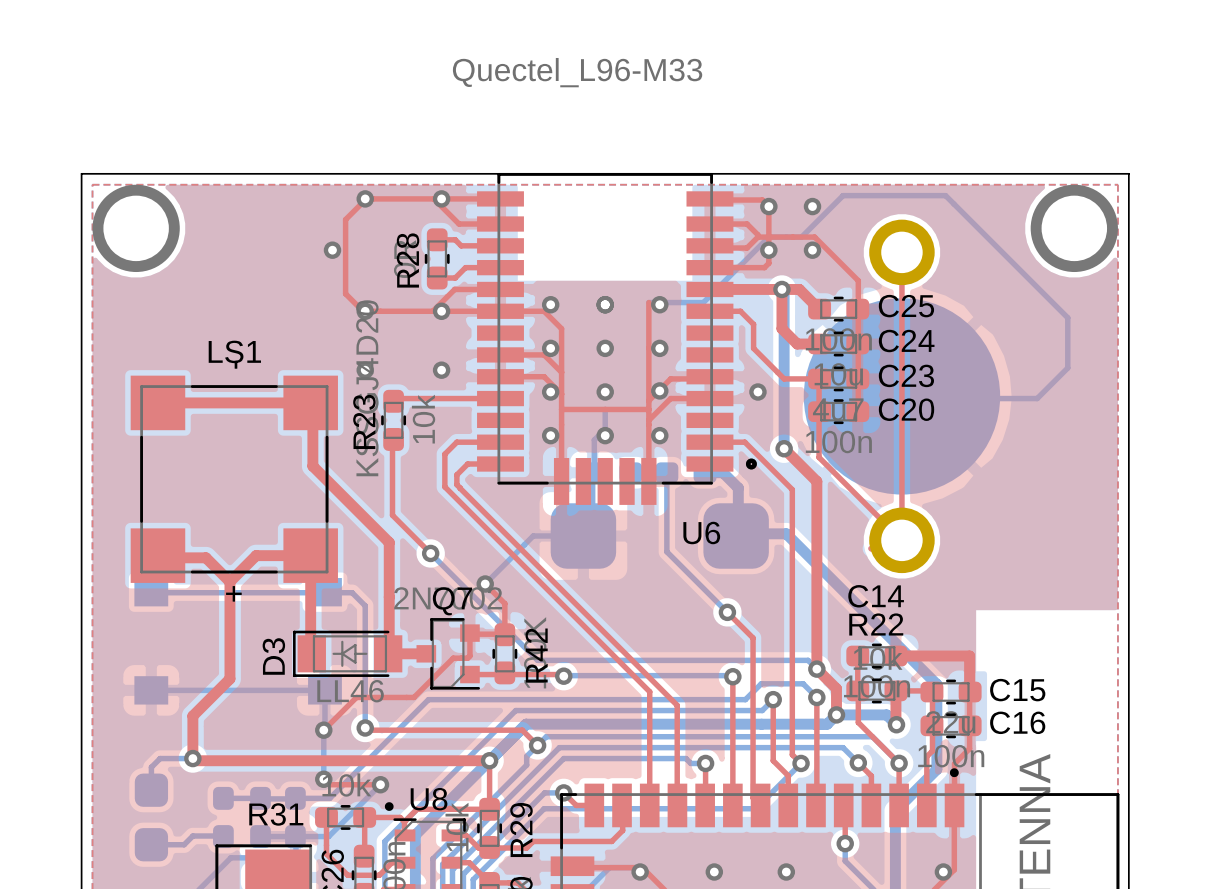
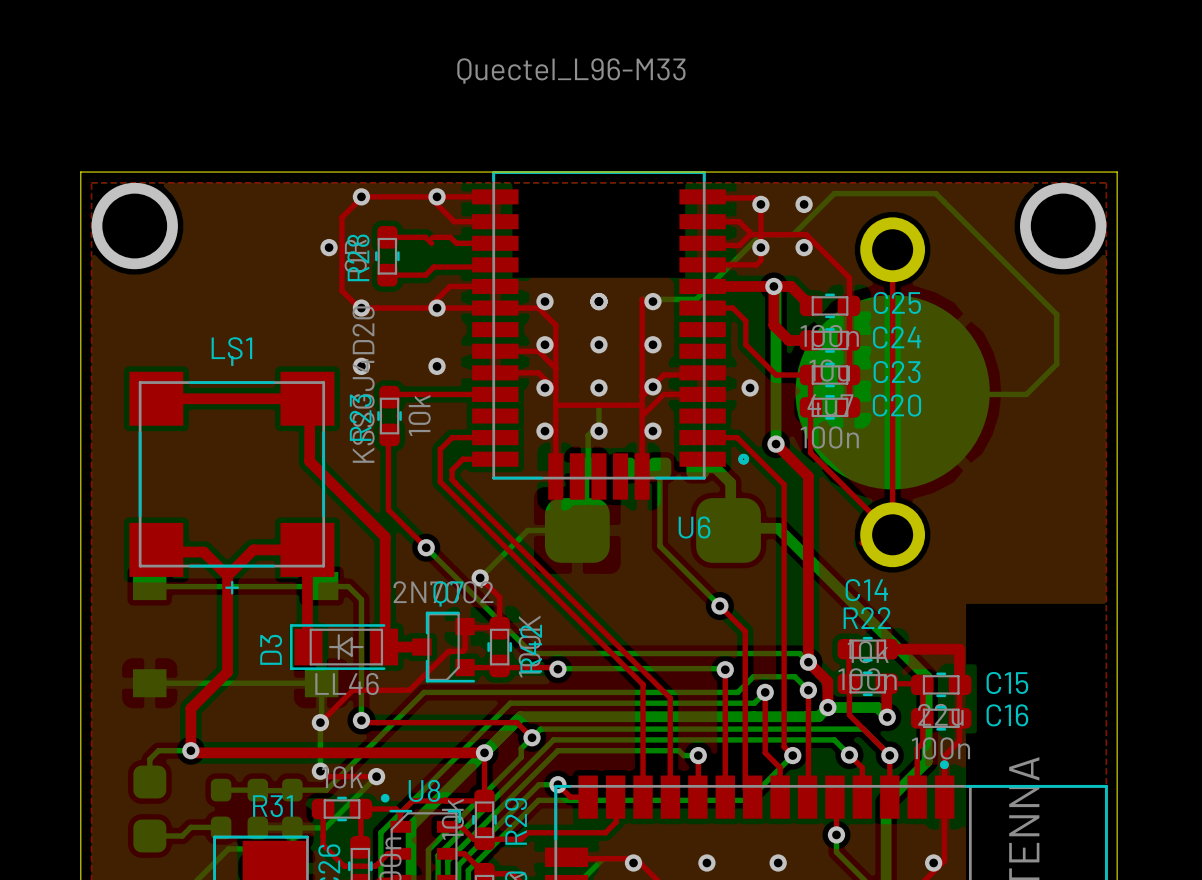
top track: none -> (387, 237) (425, 237)
R28 position: (437, 258) -> (387, 256)
top track: (501, 267) (465, 267) (455, 278) (437, 278) -> none
top track: none -> (433, 267) (495, 267)
top track: none -> (387, 275) (425, 275)

